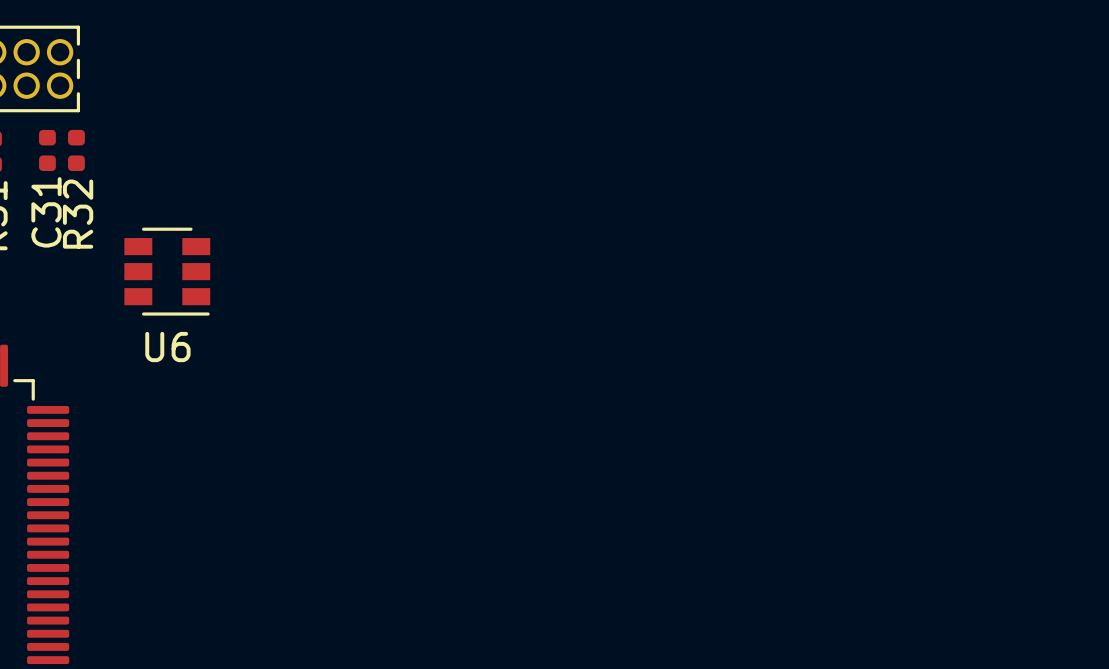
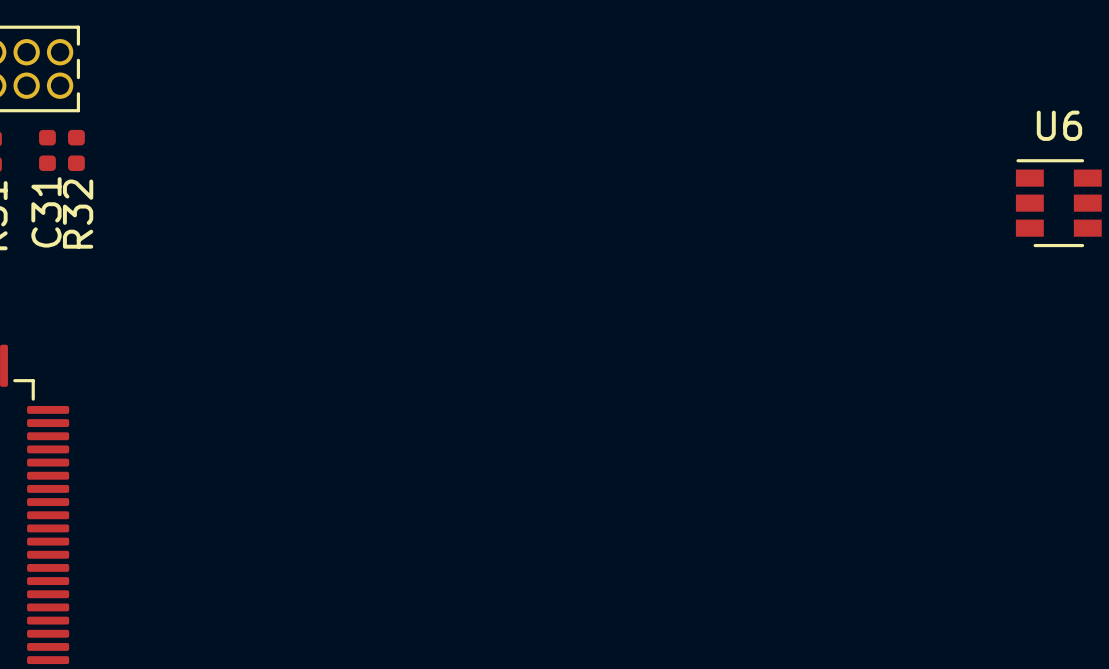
U6 rotation: 0° (167, 271) -> 180° (1058, 203)
U6 position: (167, 271) -> (1058, 203)

